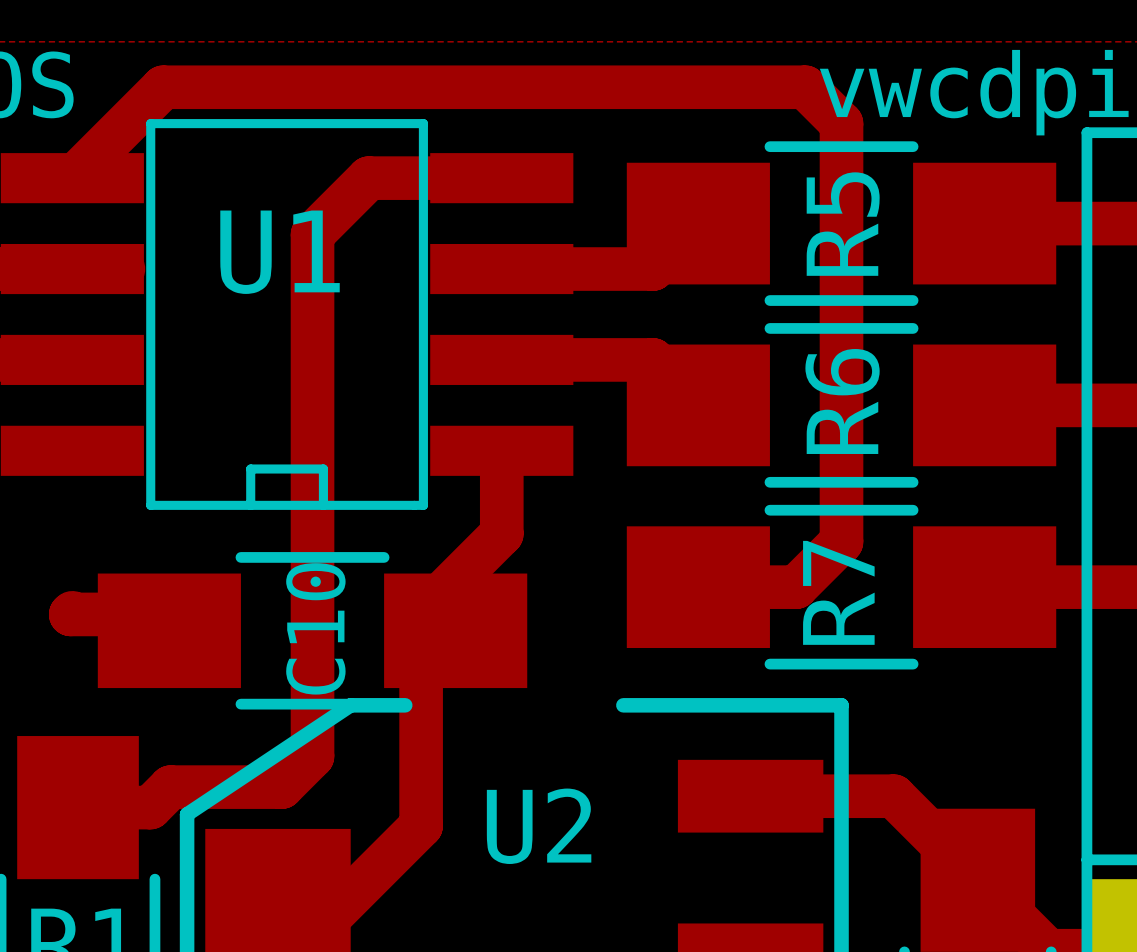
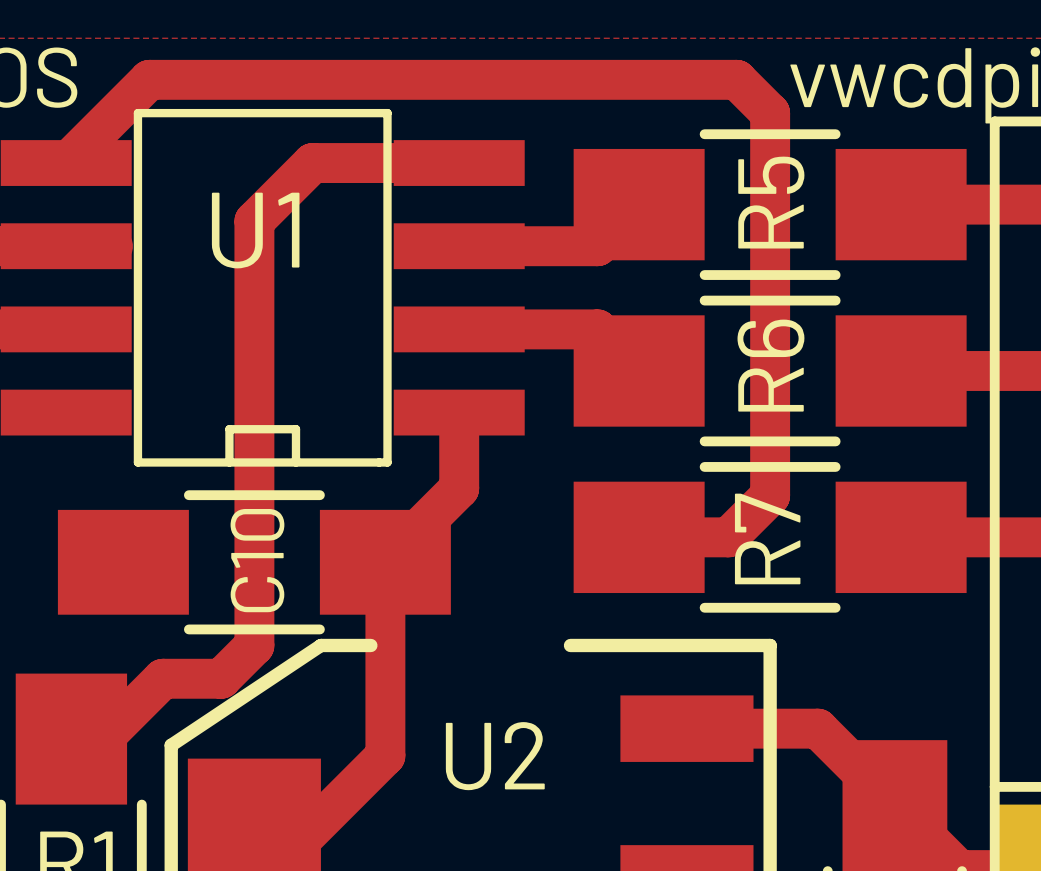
top track: (368, 178) (312, 234) (312, 756) (281, 787) (170, 787) (150, 807) (112, 807) -> (337, 163) (312, 163) (254, 221) (254, 645) (221, 678) (162, 678) (102, 739)
top track: (72, 612) (70, 614) (134, 614) -> none
C10 position: (312, 630) -> (254, 562)

